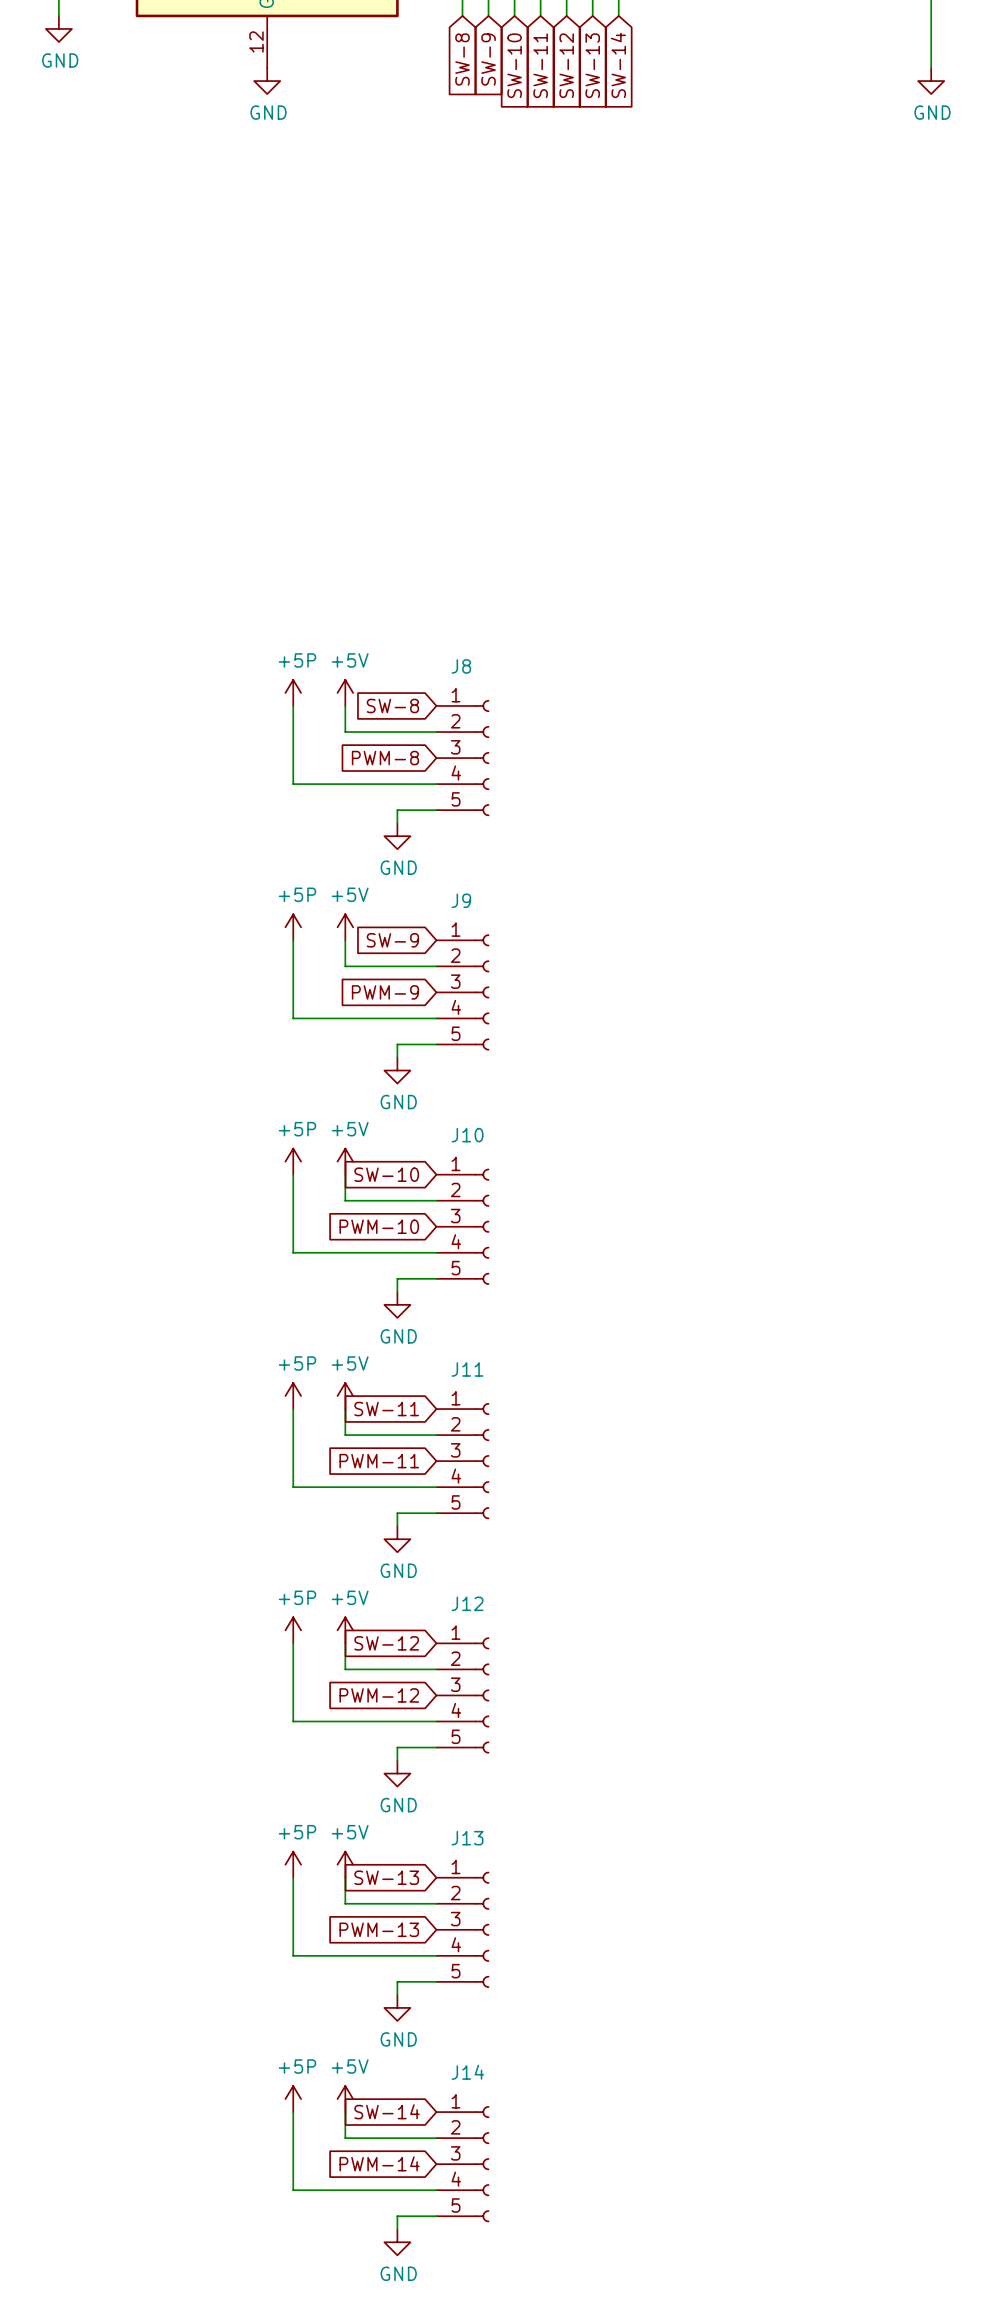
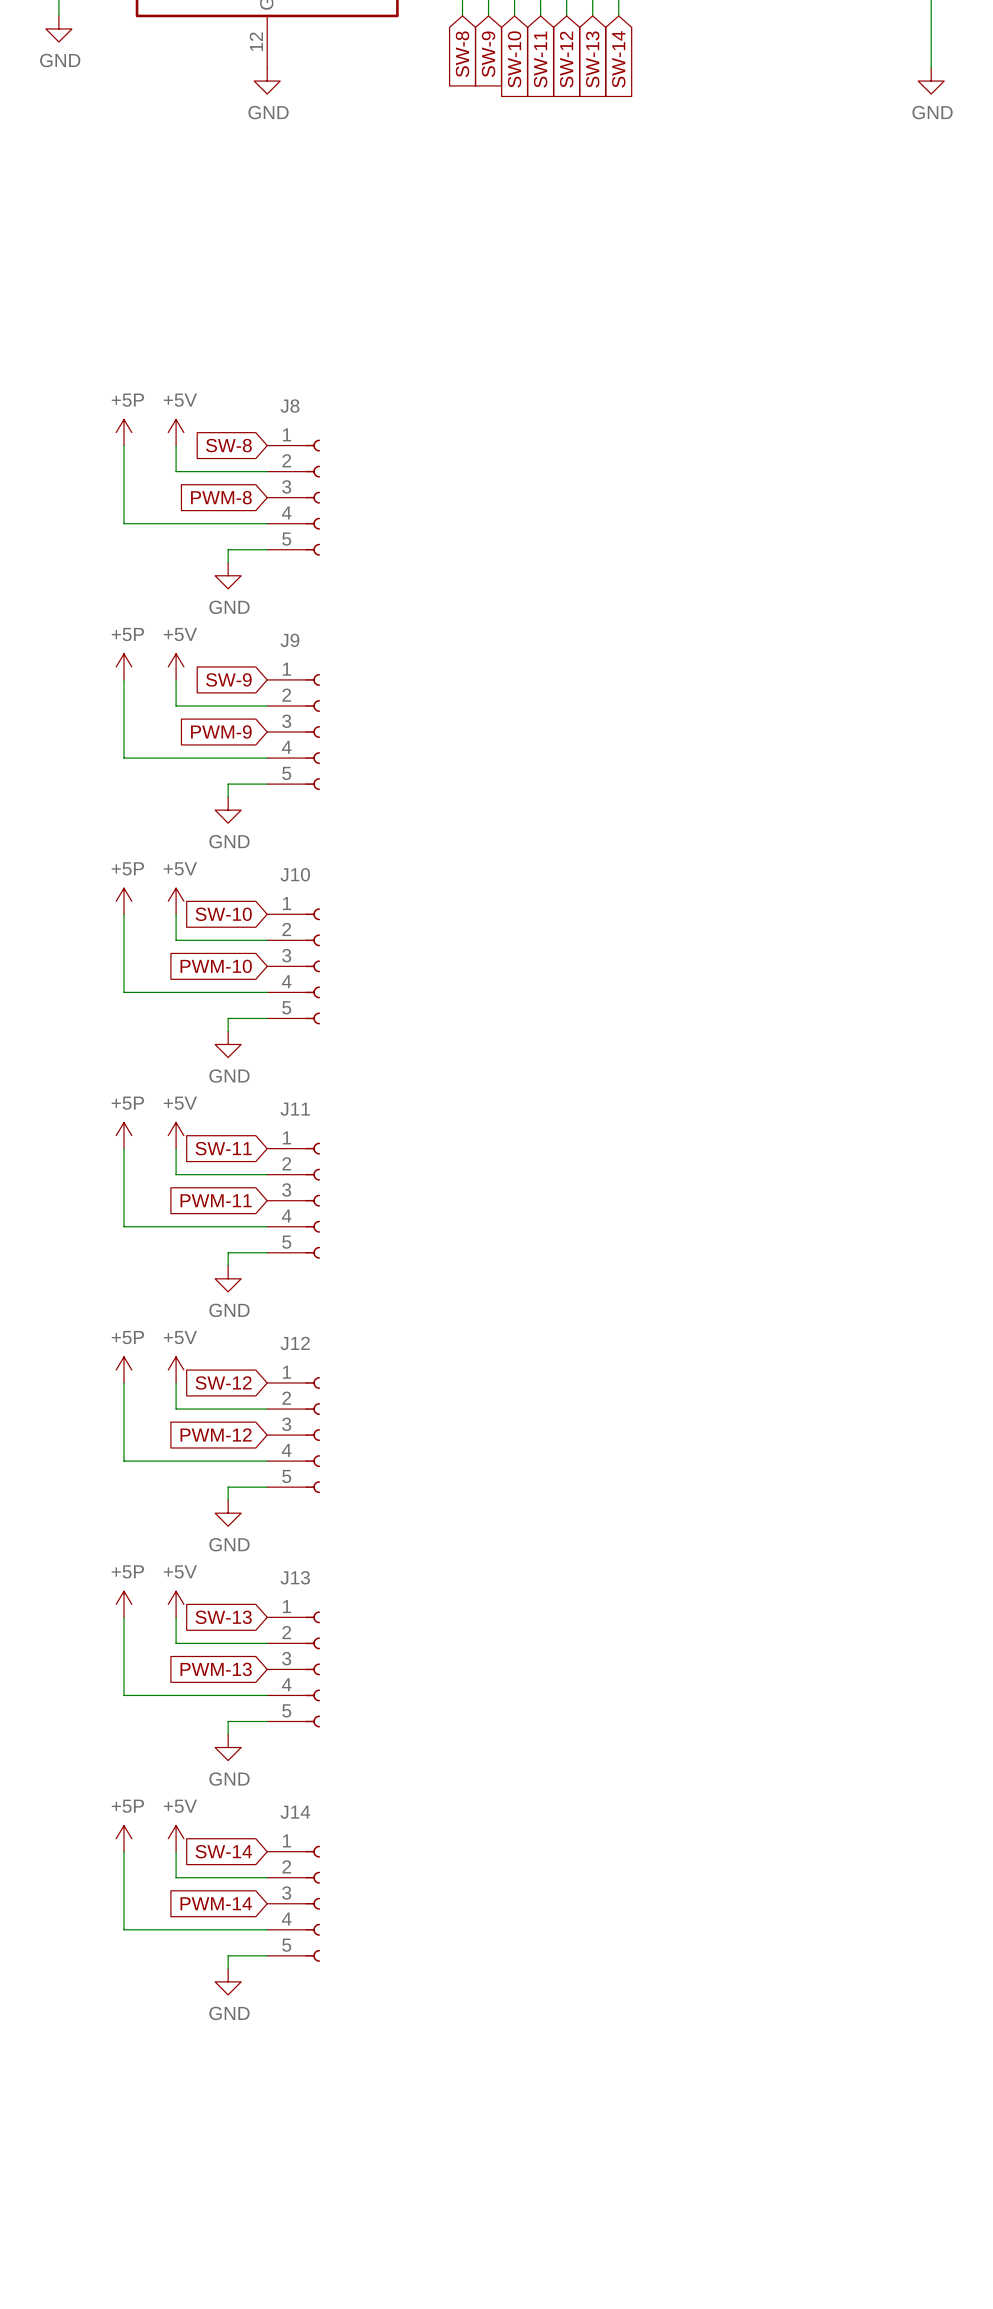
power symbol: none -> +5P (124, 432)
power symbol: none -> +5V (176, 432)
wire: none -> (124, 445) (124, 523) (267, 523)
wire: none -> (176, 445) (176, 471) (267, 471)
global label: none -> SW-8 (228, 445)
global label: none -> PWM-8 (221, 497)
wire: none -> (267, 549) (228, 549) (228, 562)
power symbol: none -> GND (228, 575)
power symbol: none -> +5P (124, 666)
power symbol: none -> +5V (176, 666)
global label: none -> SW-9 (228, 679)
power symbol: +5P (293, 692) -> none
power symbol: +5V (345, 692) -> none
wire: (293, 705) (293, 784) (436, 784) -> (124, 679) (124, 758) (267, 758)
wire: (345, 705) (345, 732) (436, 732) -> (176, 679) (176, 705) (267, 705)
global label: SW-8 (392, 705) -> none
global label: none -> PWM-9 (221, 732)
global label: PWM-8 (385, 758) -> none
J8 position: (462, 758) -> (293, 497)
power symbol: none -> GND (228, 810)
wire: (436, 810) (397, 810) (397, 823) -> (267, 784) (228, 784) (228, 797)
power symbol: GND (397, 836) -> none
power symbol: none -> +5P (124, 901)
power symbol: none -> +5V (176, 901)
global label: none -> SW-10 (223, 914)
power symbol: +5P (293, 927) -> none
power symbol: +5V (345, 927) -> none
wire: (293, 940) (293, 1018) (436, 1018) -> (124, 914) (124, 992) (267, 992)
wire: (345, 940) (345, 966) (436, 966) -> (176, 914) (176, 940) (267, 940)
global label: SW-9 (392, 940) -> none
global label: none -> PWM-10 (216, 966)
global label: PWM-9 (385, 992) -> none
J9 position: (462, 992) -> (293, 732)
power symbol: none -> GND (228, 1044)
wire: (436, 1044) (397, 1044) (397, 1057) -> (267, 1018) (228, 1018) (228, 1031)
power symbol: GND (397, 1070) -> none
power symbol: none -> +5P (124, 1135)
power symbol: none -> +5V (176, 1135)
global label: none -> SW-11 (223, 1148)
power symbol: +5P (293, 1161) -> none
power symbol: +5V (345, 1161) -> none
wire: (293, 1174) (293, 1252) (436, 1252) -> (124, 1148) (124, 1226) (267, 1226)
wire: (345, 1174) (345, 1200) (436, 1200) -> (176, 1148) (176, 1174) (267, 1174)
global label: SW-10 (386, 1174) -> none
global label: none -> PWM-11 (216, 1200)
global label: PWM-10 (379, 1226) -> none
J10 position: (462, 1226) -> (293, 966)
power symbol: none -> GND (228, 1278)
wire: (436, 1278) (397, 1278) (397, 1291) -> (267, 1252) (228, 1252) (228, 1265)
power symbol: GND (397, 1304) -> none
power symbol: none -> +5P (124, 1369)
power symbol: none -> +5V (176, 1369)
global label: none -> SW-12 (223, 1382)
power symbol: +5P (293, 1396) -> none
power symbol: +5V (345, 1396) -> none
wire: (293, 1409) (293, 1487) (436, 1487) -> (124, 1382) (124, 1461) (267, 1461)
wire: (345, 1409) (345, 1435) (436, 1435) -> (176, 1382) (176, 1409) (267, 1409)
global label: SW-11 (386, 1409) -> none
global label: none -> PWM-12 (216, 1434)
global label: PWM-11 (379, 1461) -> none
J11 position: (462, 1461) -> (293, 1200)
power symbol: none -> GND (228, 1513)
wire: (436, 1513) (397, 1513) (397, 1526) -> (267, 1487) (228, 1487) (228, 1500)
power symbol: GND (397, 1539) -> none
power symbol: none -> +5P (124, 1604)
power symbol: none -> +5V (176, 1604)
global label: none -> SW-13 (223, 1617)
power symbol: +5P (293, 1630) -> none
power symbol: +5V (345, 1630) -> none
wire: (293, 1643) (293, 1721) (436, 1721) -> (124, 1617) (124, 1695) (267, 1695)
wire: (345, 1643) (345, 1669) (436, 1669) -> (176, 1617) (176, 1643) (267, 1643)
global label: SW-12 (386, 1643) -> none
global label: none -> PWM-13 (216, 1669)
global label: PWM-12 (379, 1695) -> none
J12 position: (462, 1695) -> (293, 1435)
power symbol: none -> GND (228, 1747)
wire: (436, 1747) (397, 1747) (397, 1760) -> (267, 1721) (228, 1721) (228, 1734)
power symbol: GND (397, 1773) -> none
power symbol: none -> +5P (124, 1838)
power symbol: none -> +5V (176, 1838)
global label: none -> SW-14 (223, 1851)
power symbol: +5P (293, 1864) -> none
power symbol: +5V (345, 1864) -> none
wire: (293, 1877) (293, 1955) (436, 1955) -> (124, 1851) (124, 1929) (267, 1929)
wire: (345, 1877) (345, 1903) (436, 1903) -> (176, 1851) (176, 1877) (267, 1877)
global label: SW-13 (386, 1877) -> none
global label: none -> PWM-14 (216, 1903)
global label: PWM-13 (379, 1929) -> none
J13 position: (462, 1929) -> (293, 1669)
power symbol: none -> GND (228, 1981)
wire: (436, 1981) (397, 1981) (397, 1994) -> (267, 1955) (228, 1955) (228, 1968)
power symbol: GND (397, 2007) -> none
power symbol: +5P (293, 2099) -> none
power symbol: +5V (345, 2099) -> none
global label: SW-14 (387, 2111) -> none
wire: (293, 2112) (293, 2190) (436, 2190) -> none
wire: (345, 2112) (345, 2138) (436, 2138) -> none
global label: PWM-14 (379, 2163) -> none
J14 position: (462, 2164) -> (293, 1903)
wire: (436, 2216) (397, 2216) (397, 2229) -> none
power symbol: GND (397, 2242) -> none

